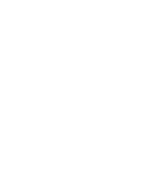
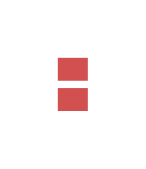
part: none -> (72, 84)

